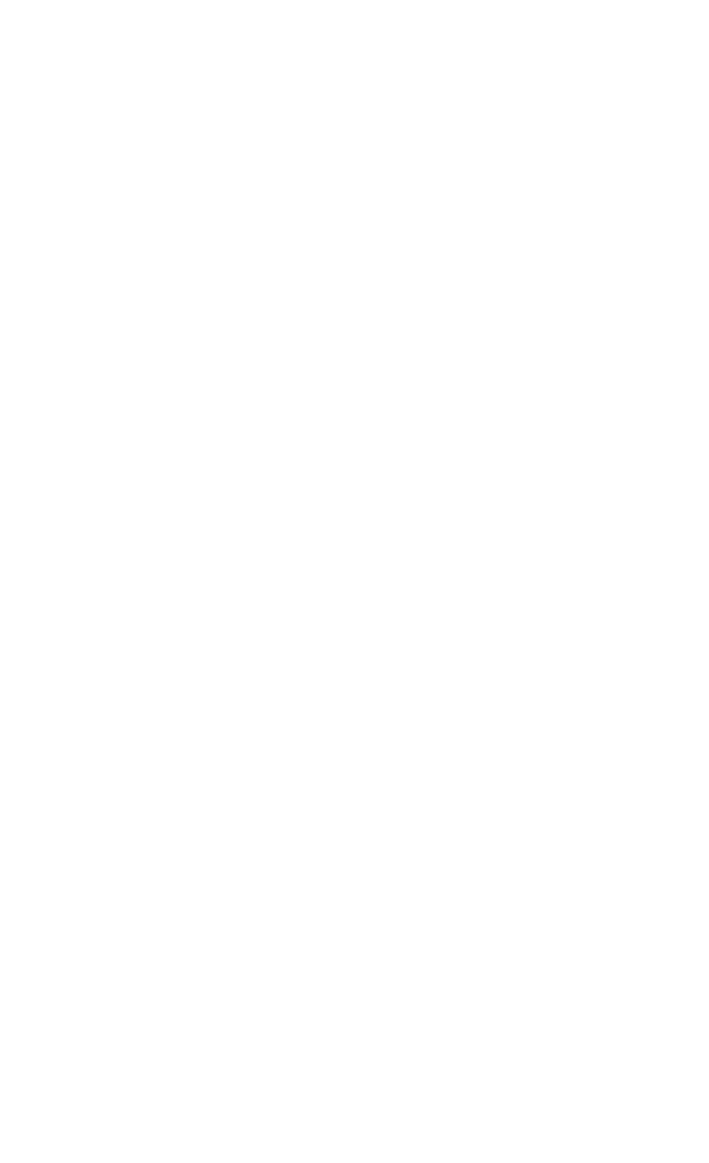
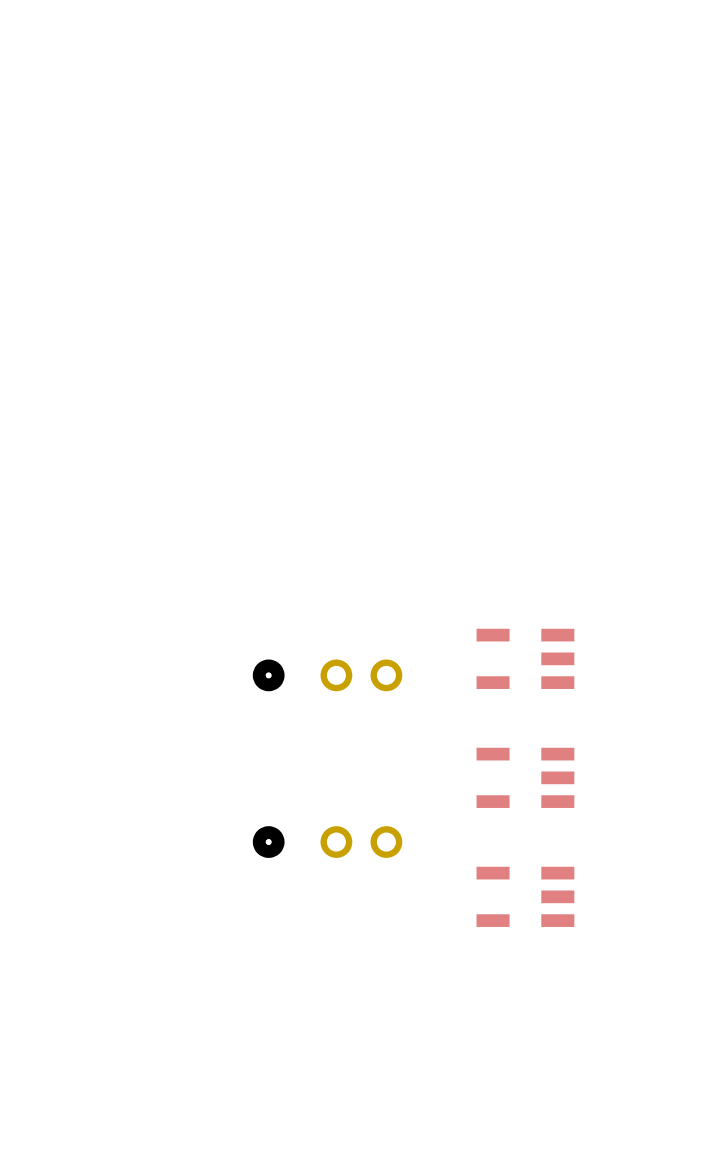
part: none -> (525, 658)
part: none -> (327, 675)
part: none -> (525, 777)
part: none -> (327, 842)
part: none -> (525, 896)

